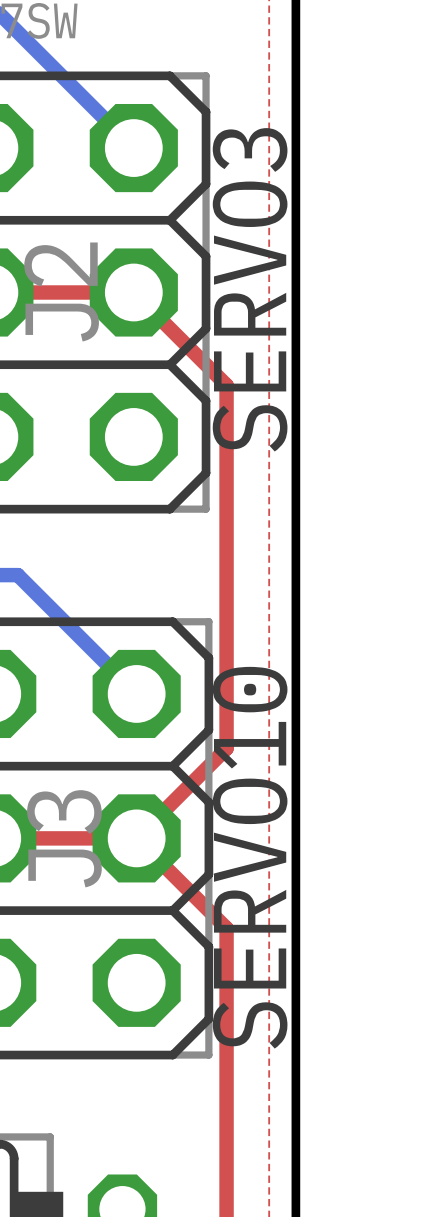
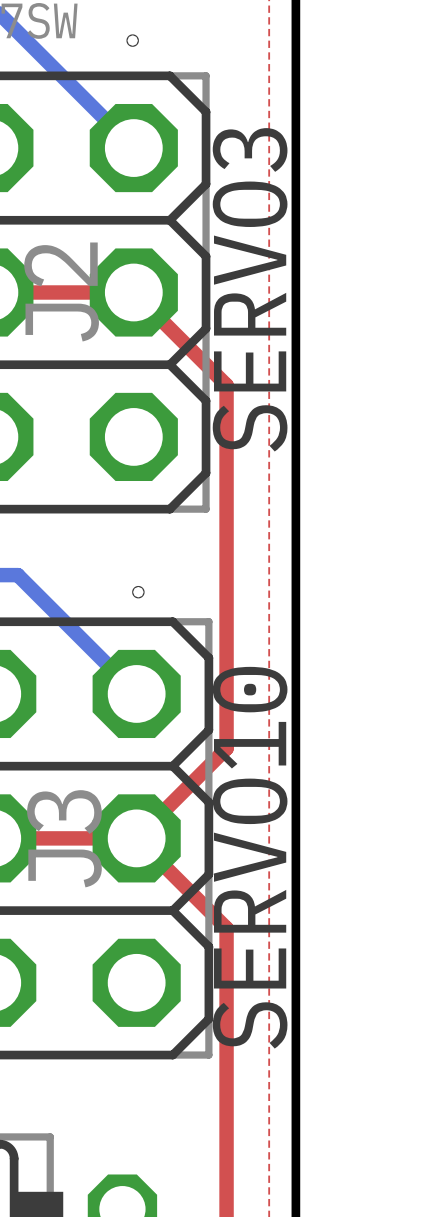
drawing: none -> [126, 34, 139, 47]
drawing: none -> [132, 585, 145, 599]

